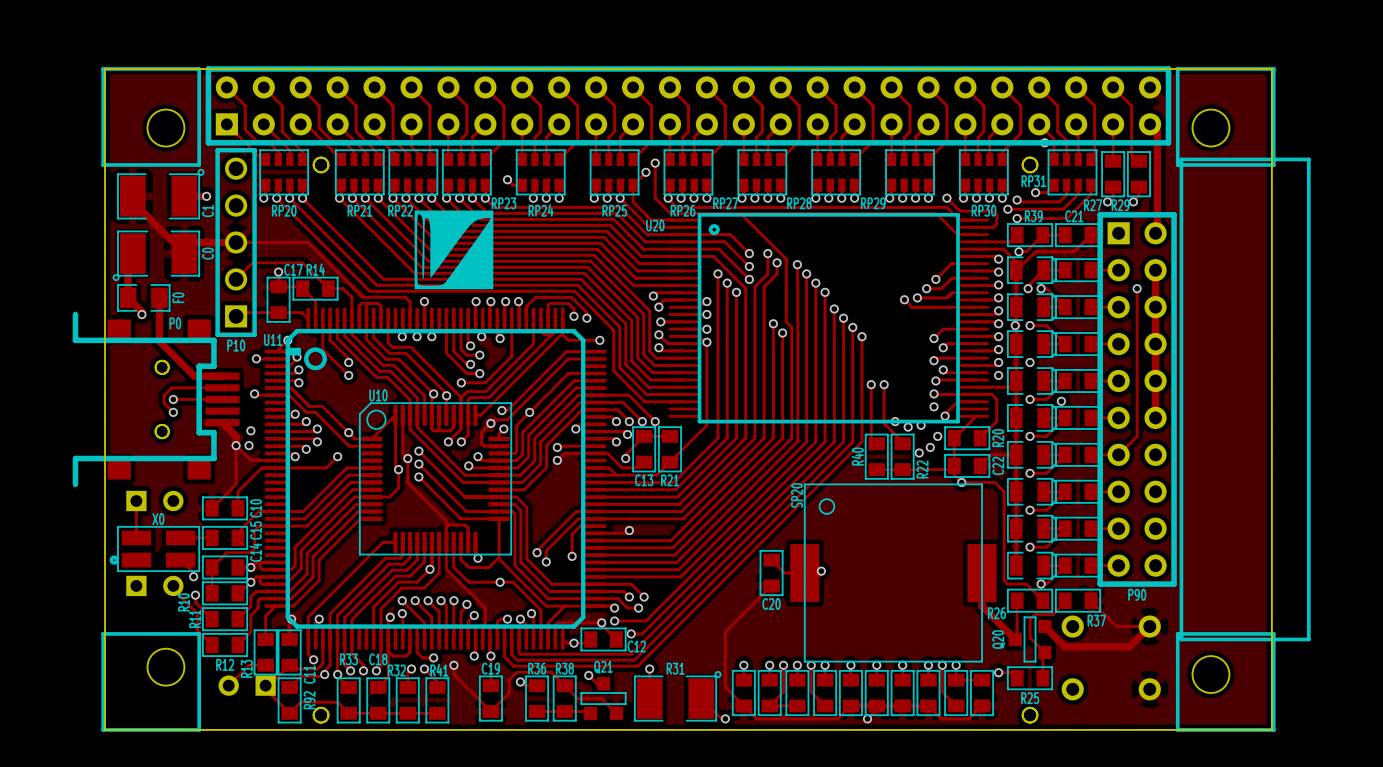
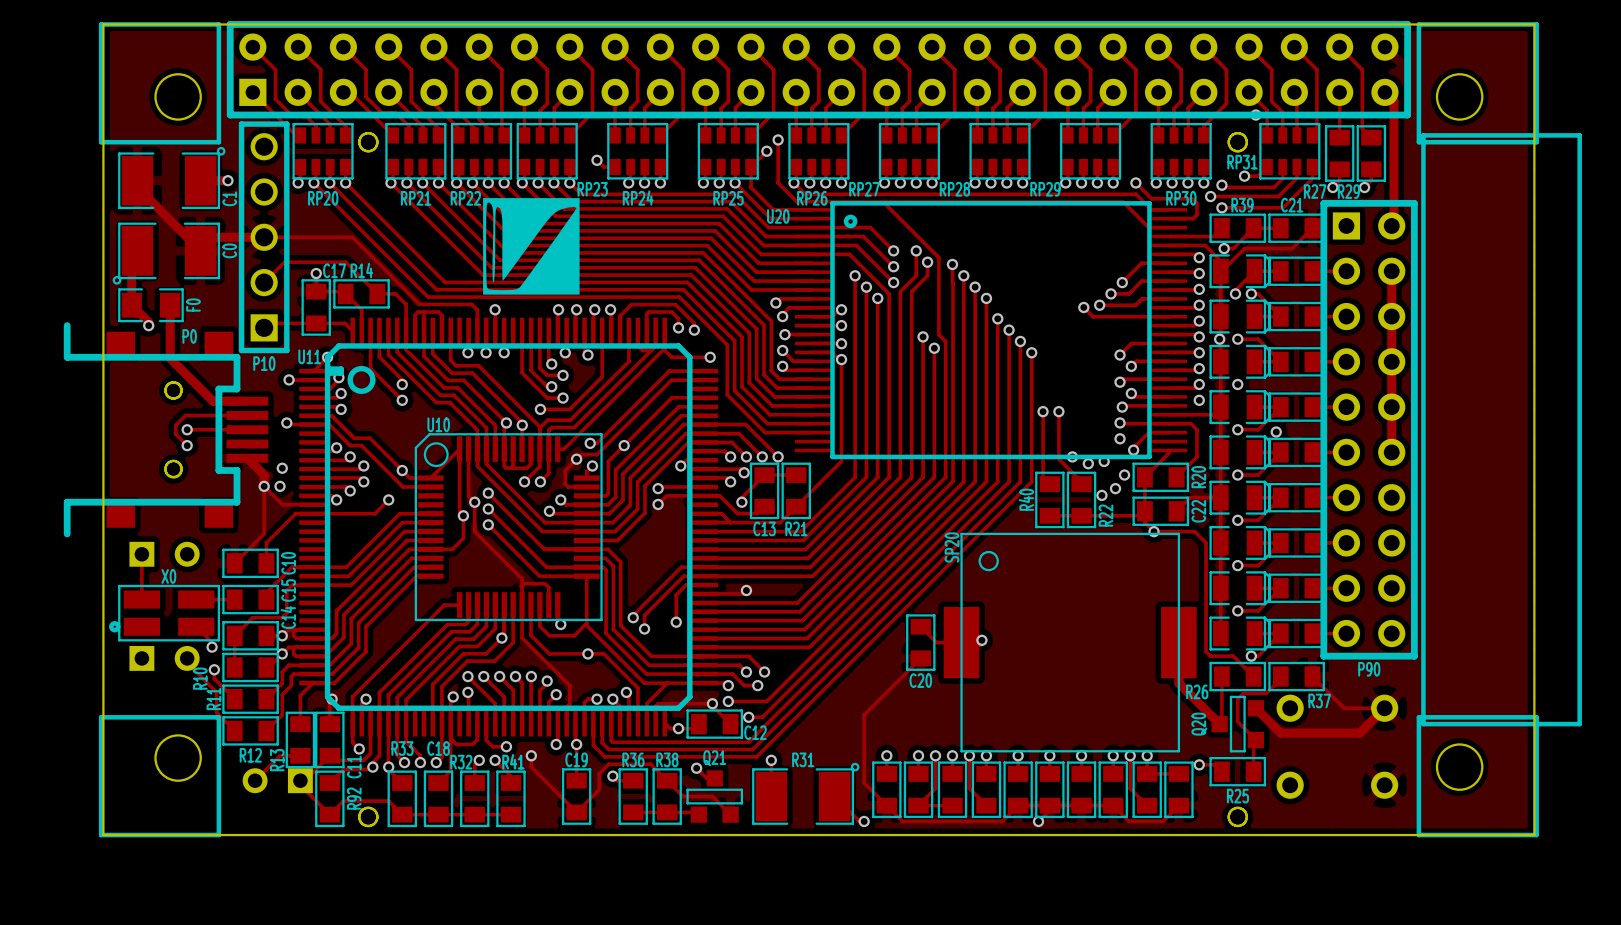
track: (1137, 288) (1137, 436) (1118, 454) -> none
via: (1137, 288) -> none

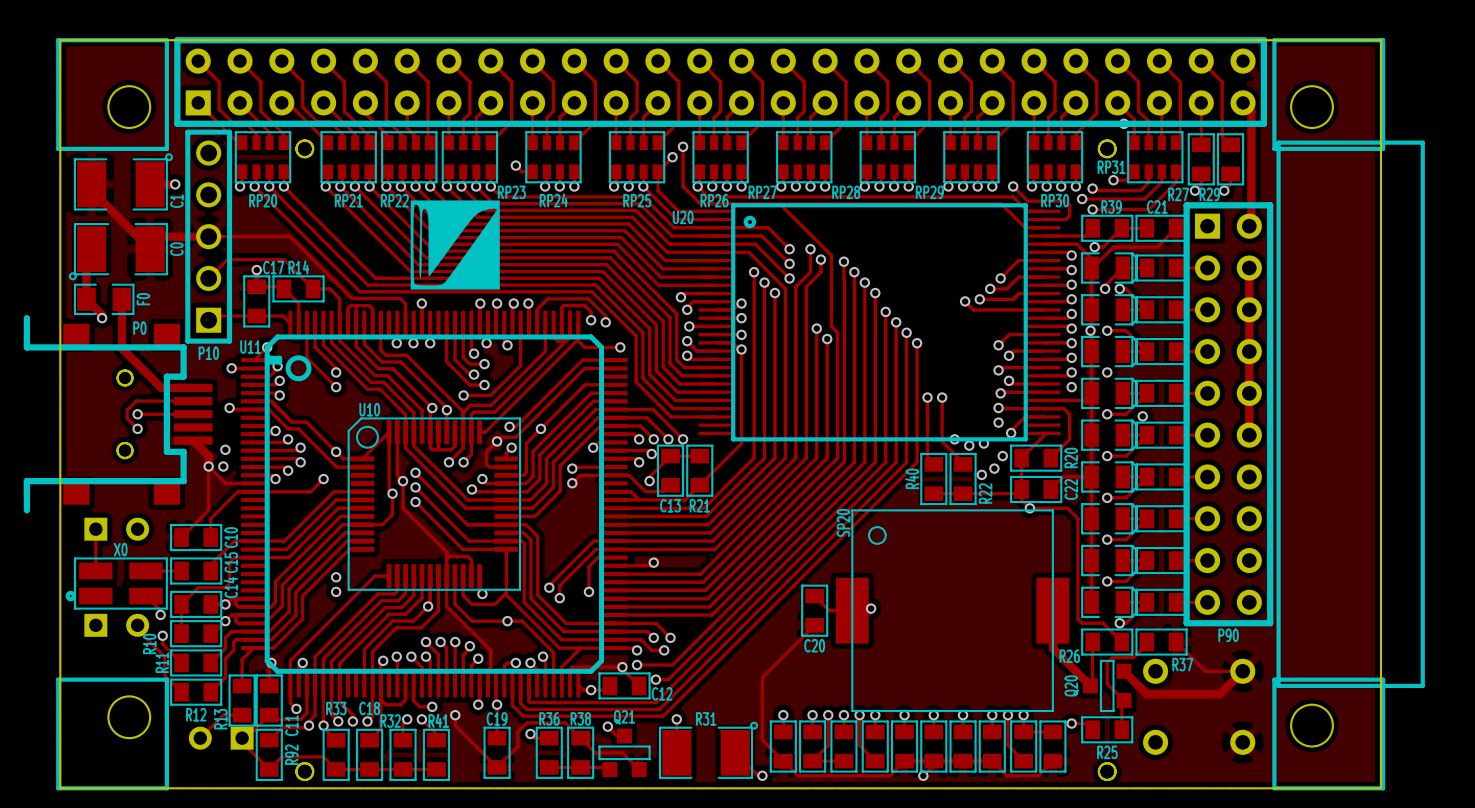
via: none -> (336, 577)
via: none -> (336, 591)
track: (467, 676) (483, 692) -> none
via: (467, 676) -> none
track: (483, 676) (499, 692) -> none
via: (483, 676) -> none
via: none -> (411, 656)
via: none -> (426, 656)

